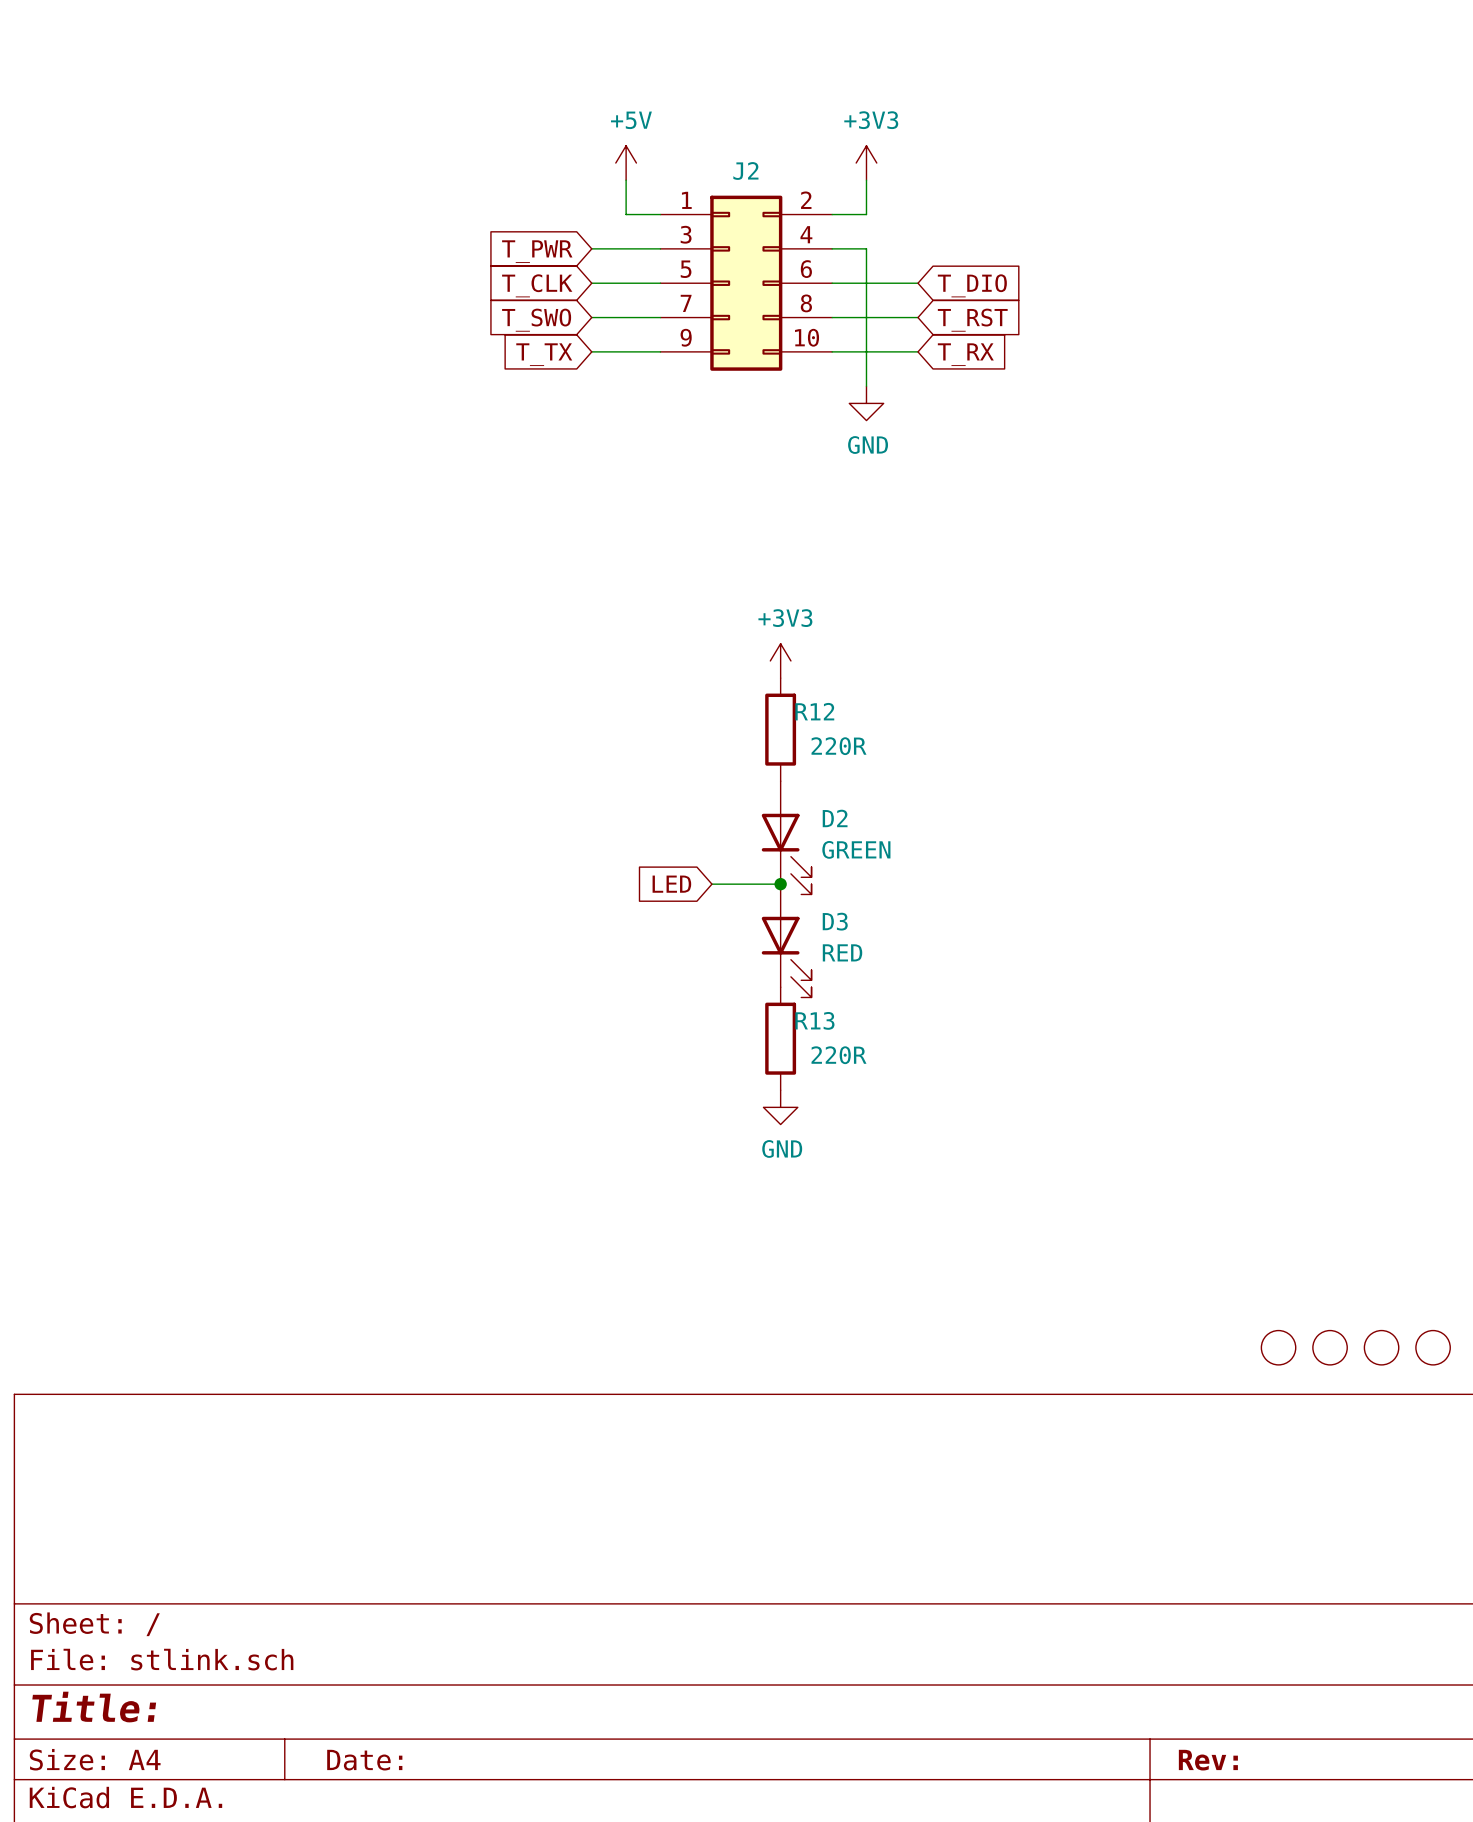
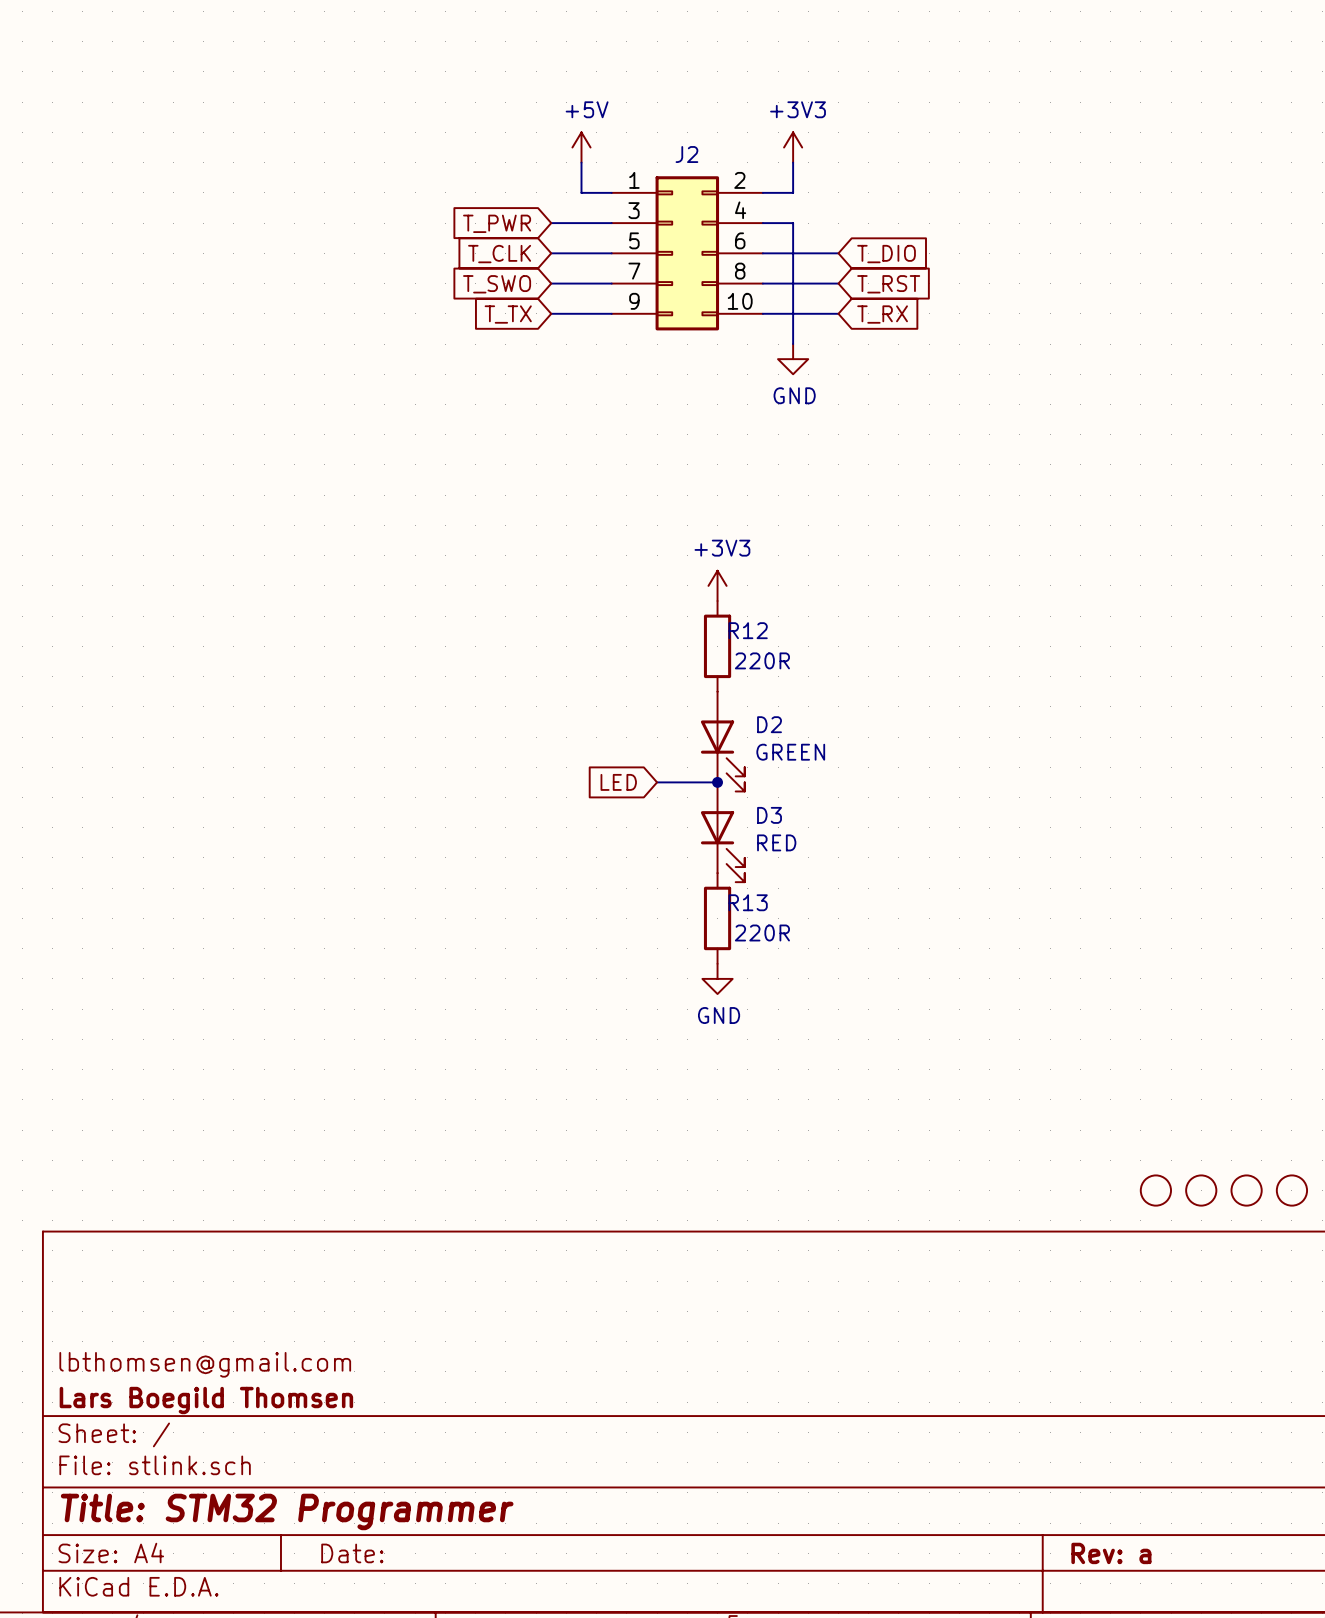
title block: none -> lbthomsen@gmail.com (205, 1364)
title block: none -> Lars Boegild Thomsen (206, 1400)
title block: Title: (94, 1707) -> Title: STM32 Programmer (287, 1511)
title block: Rev: (1208, 1760) -> Rev: a (1111, 1553)

